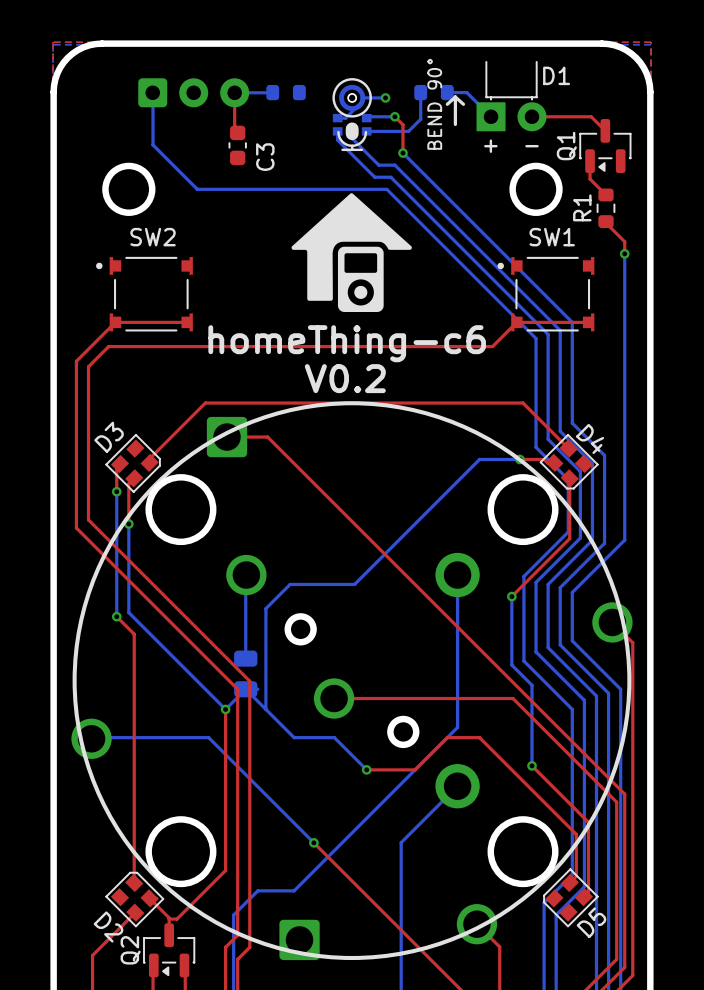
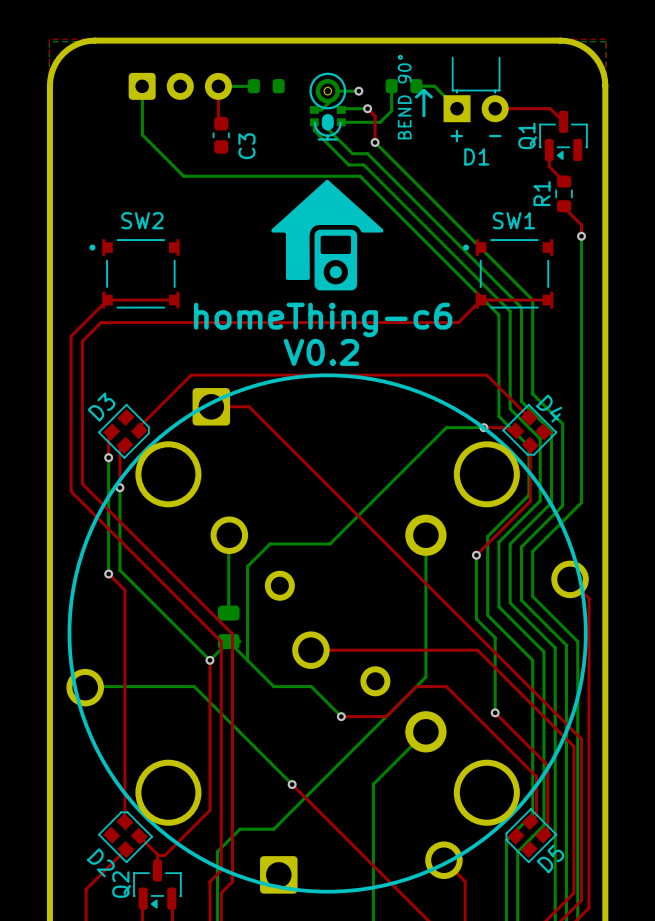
D1 name position: D1 (556, 75) -> D1 (476, 156)
round board edge: [102, 162, 156, 216] -> none
round board edge: [509, 162, 563, 216] -> none

